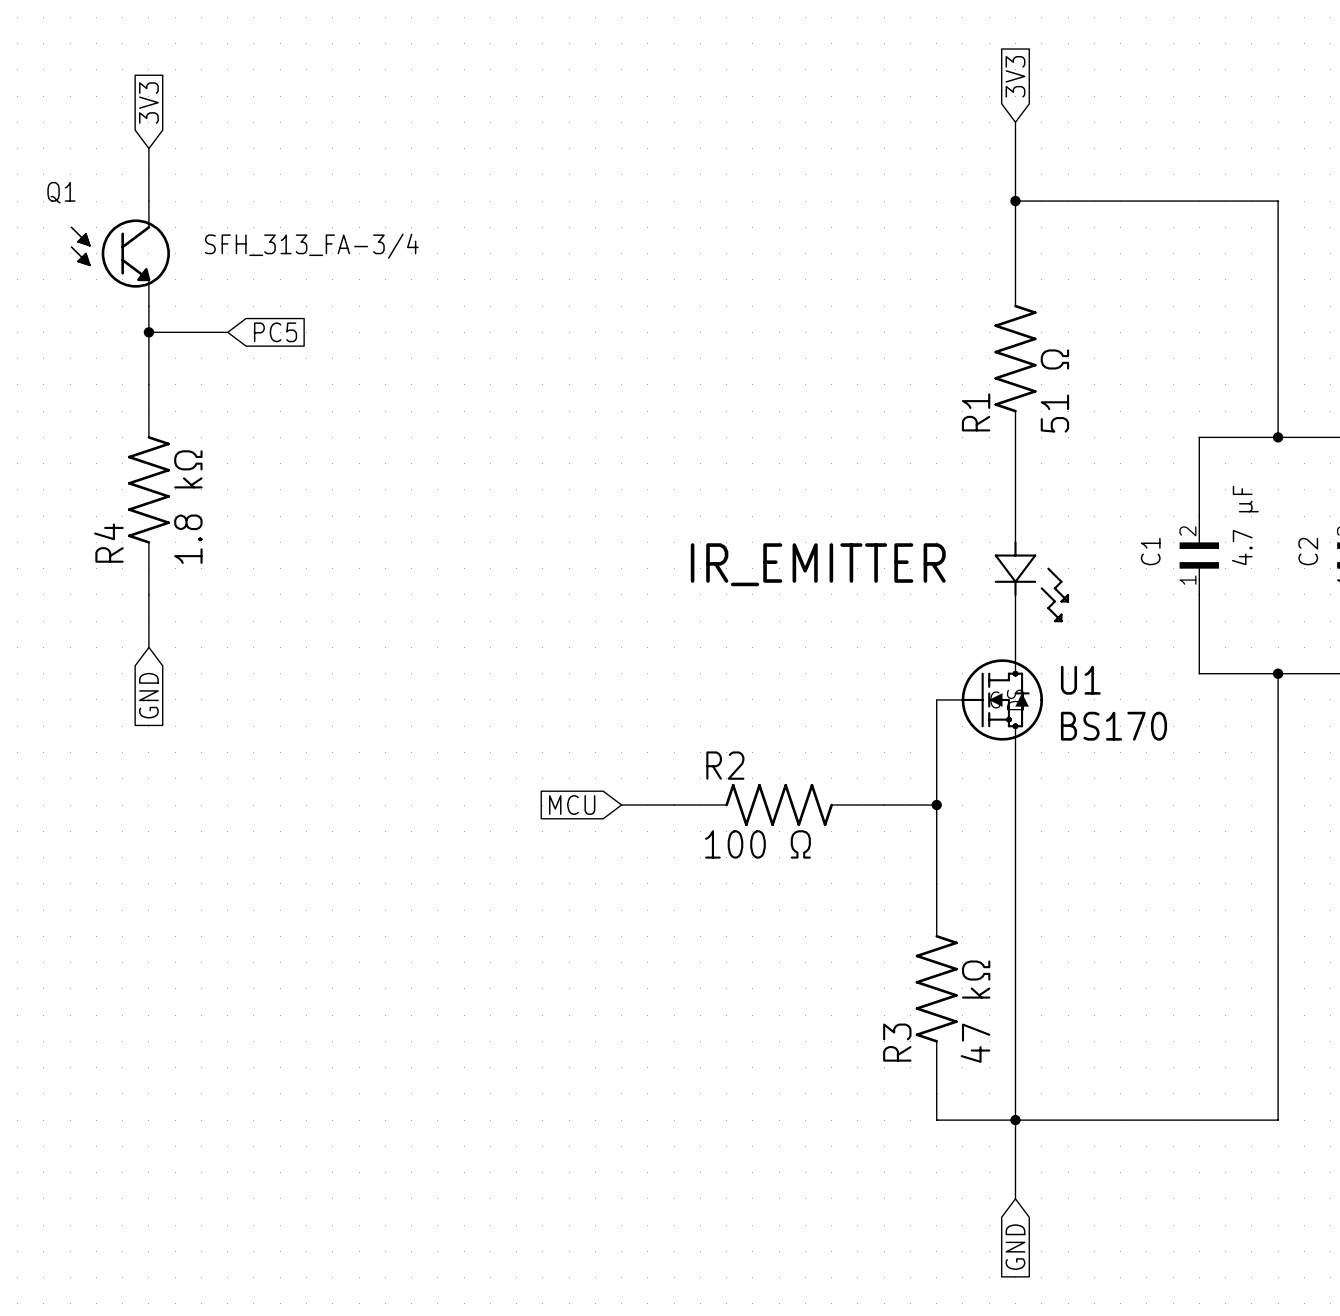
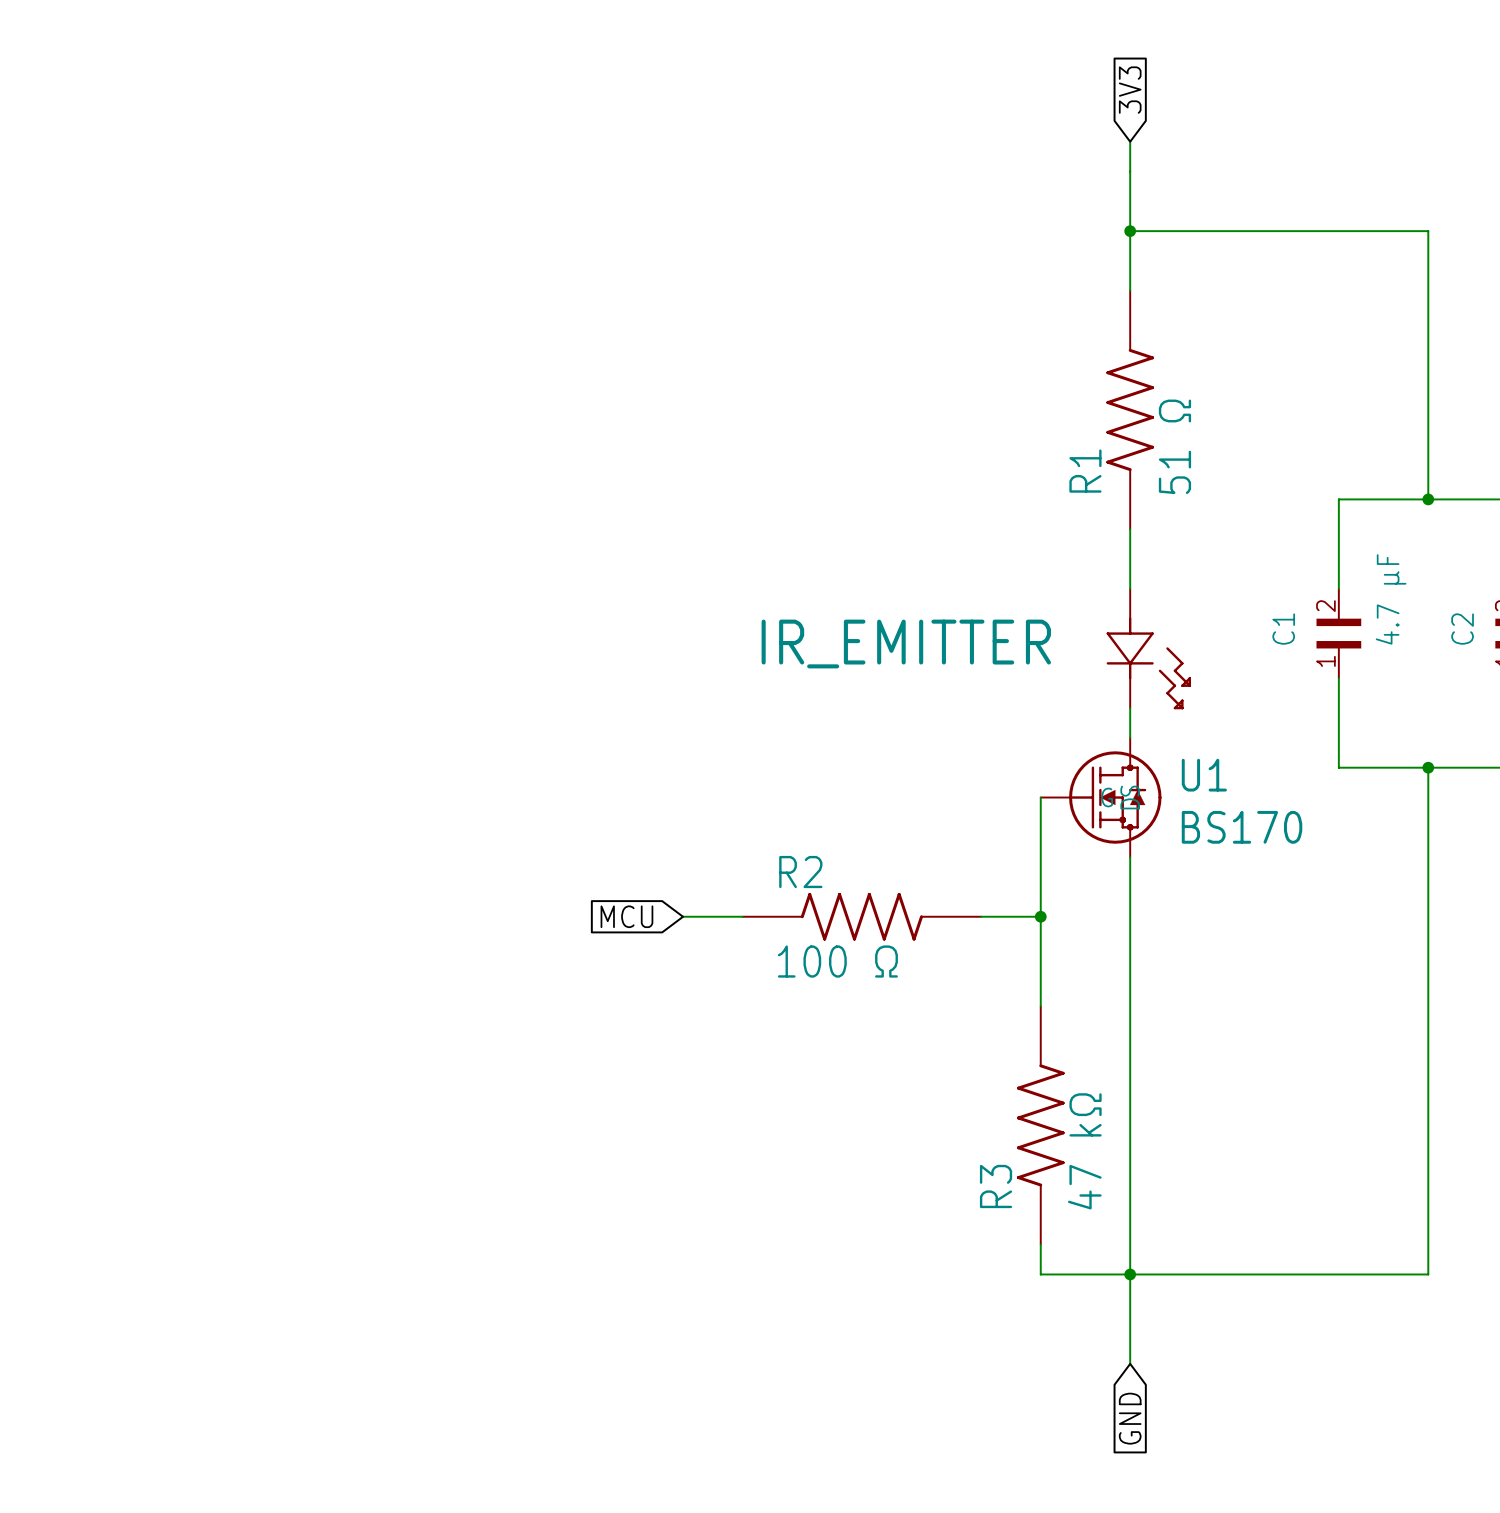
global label: 3V3 (148, 103) -> none
wire: (148, 148) (148, 201) -> none
Q1: SFH_313_FA-3/4 (120, 253) -> none
wire: (148, 306) (148, 384) -> none
wire: (148, 332) (227, 332) -> none
junction: (148, 332) -> none
global label: PC5 (275, 332) -> none
R4: 1.8 kΩ (148, 489) -> none
wire: (148, 594) (148, 647) -> none
global label: GND (148, 695) -> none

